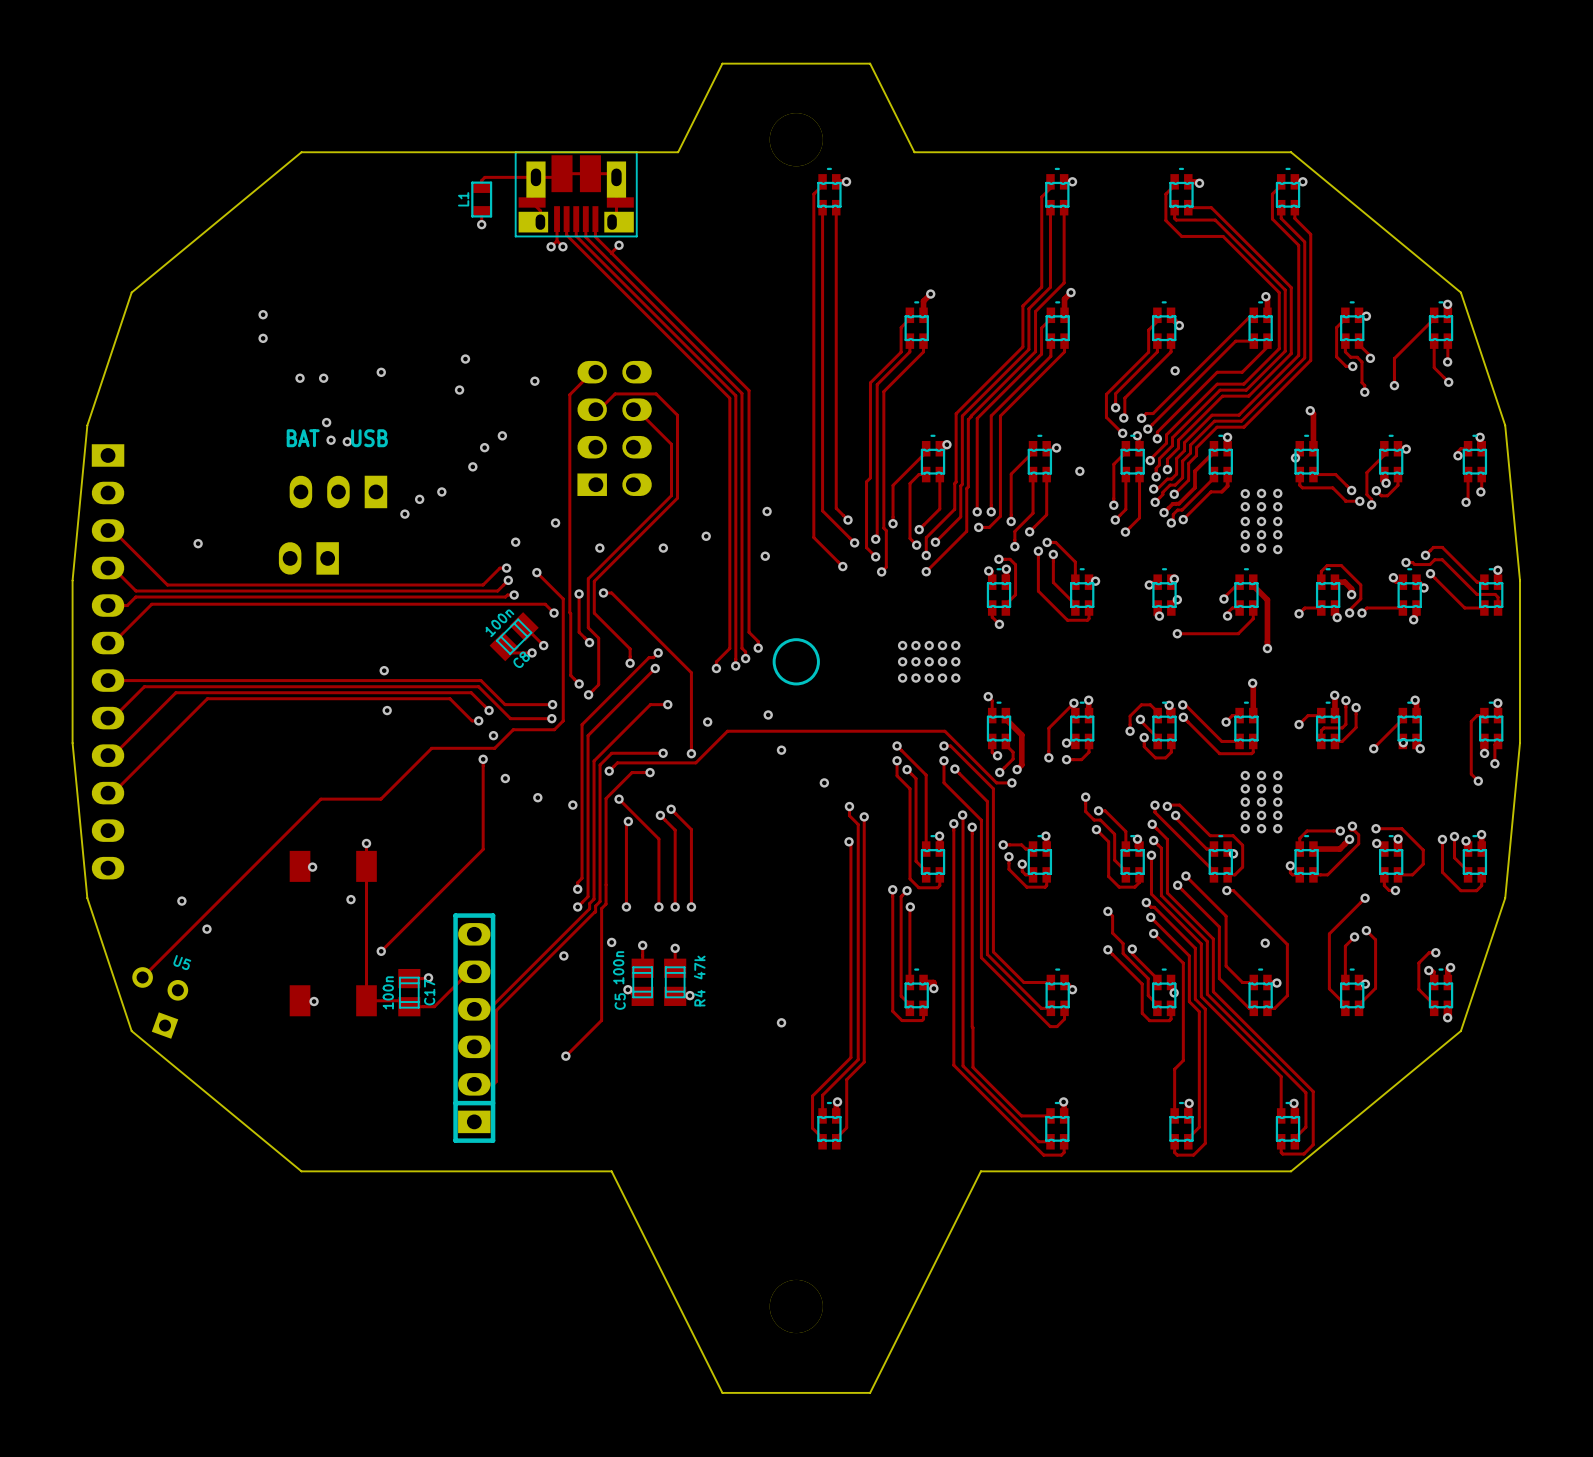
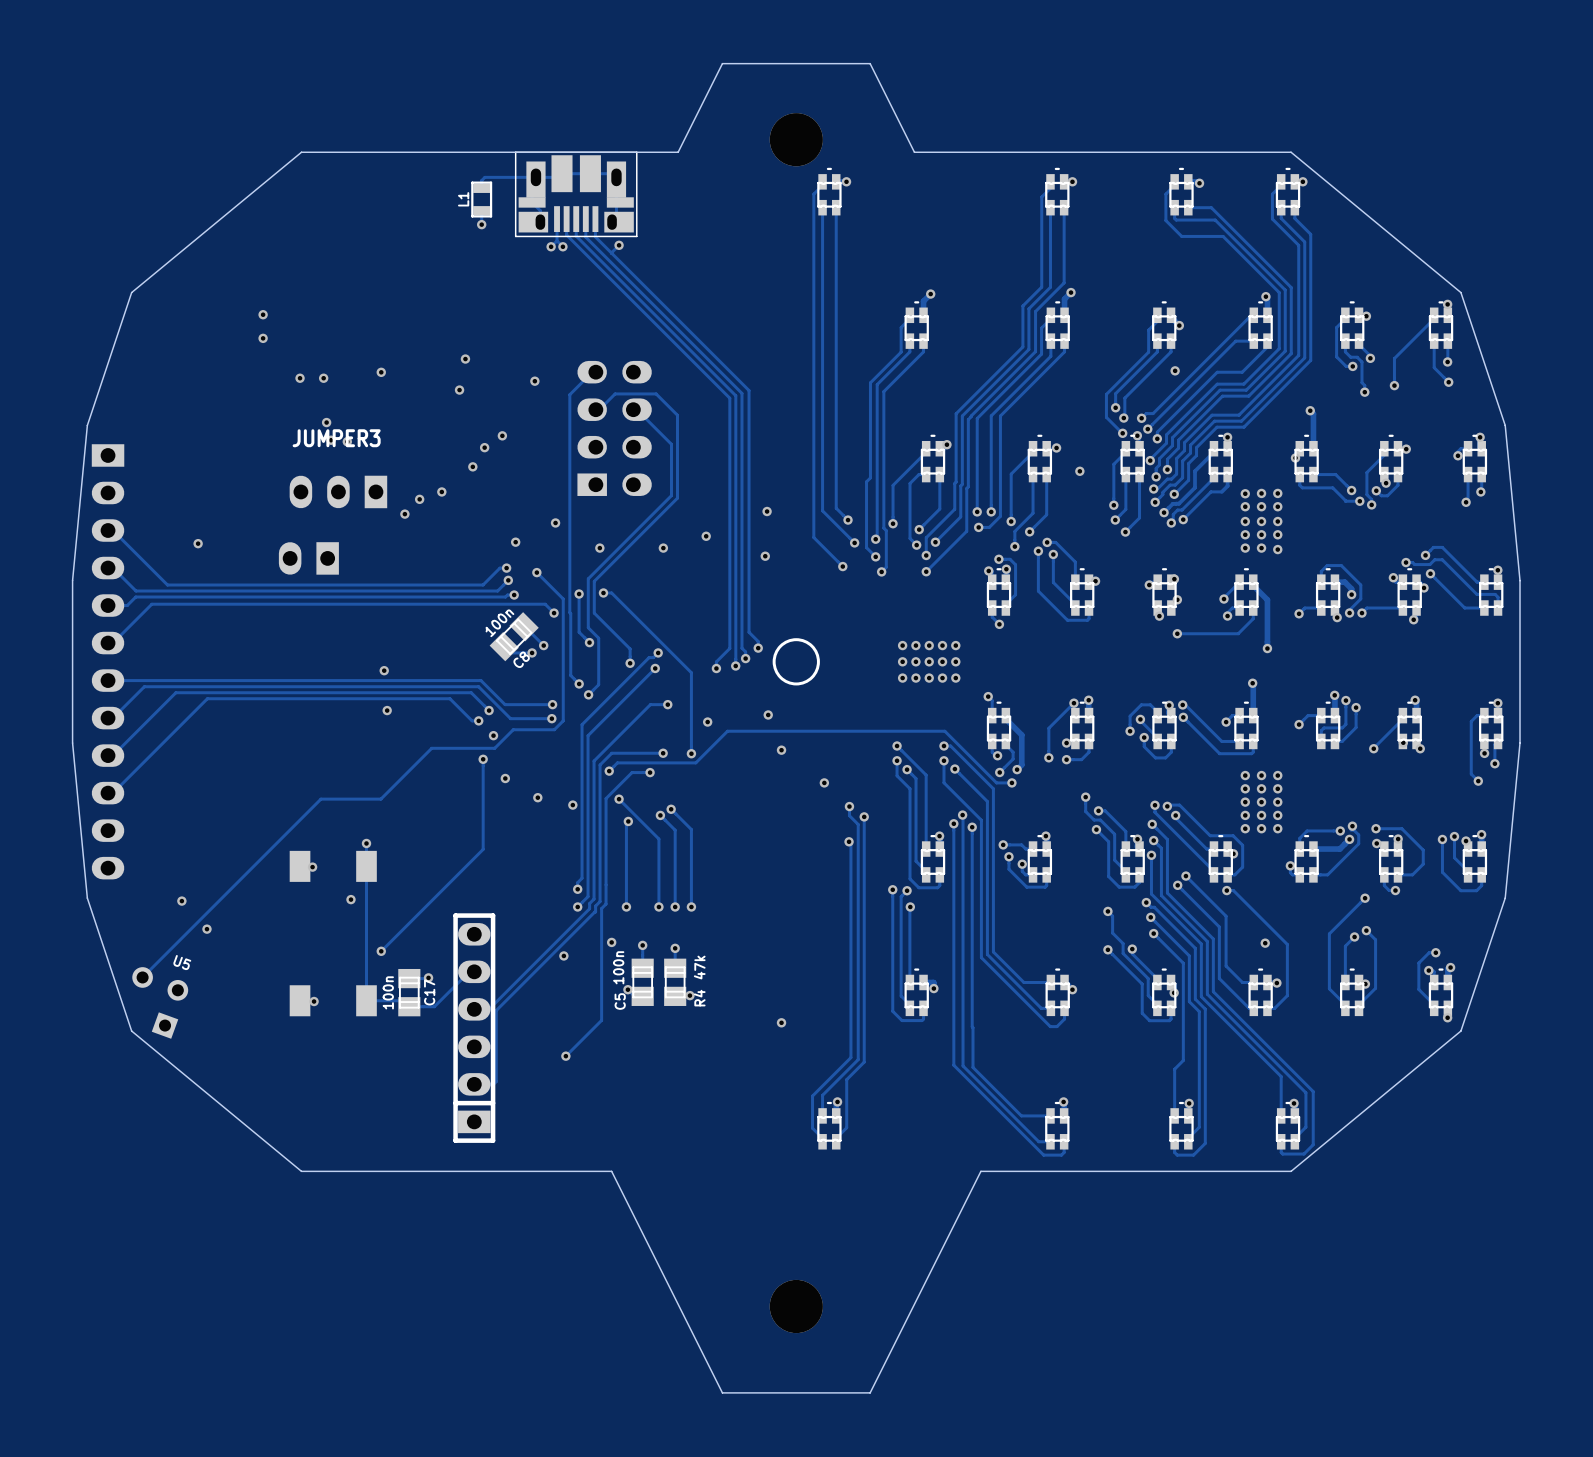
part value: BAT USB (337, 438) -> JUMPER3 (336, 438)

